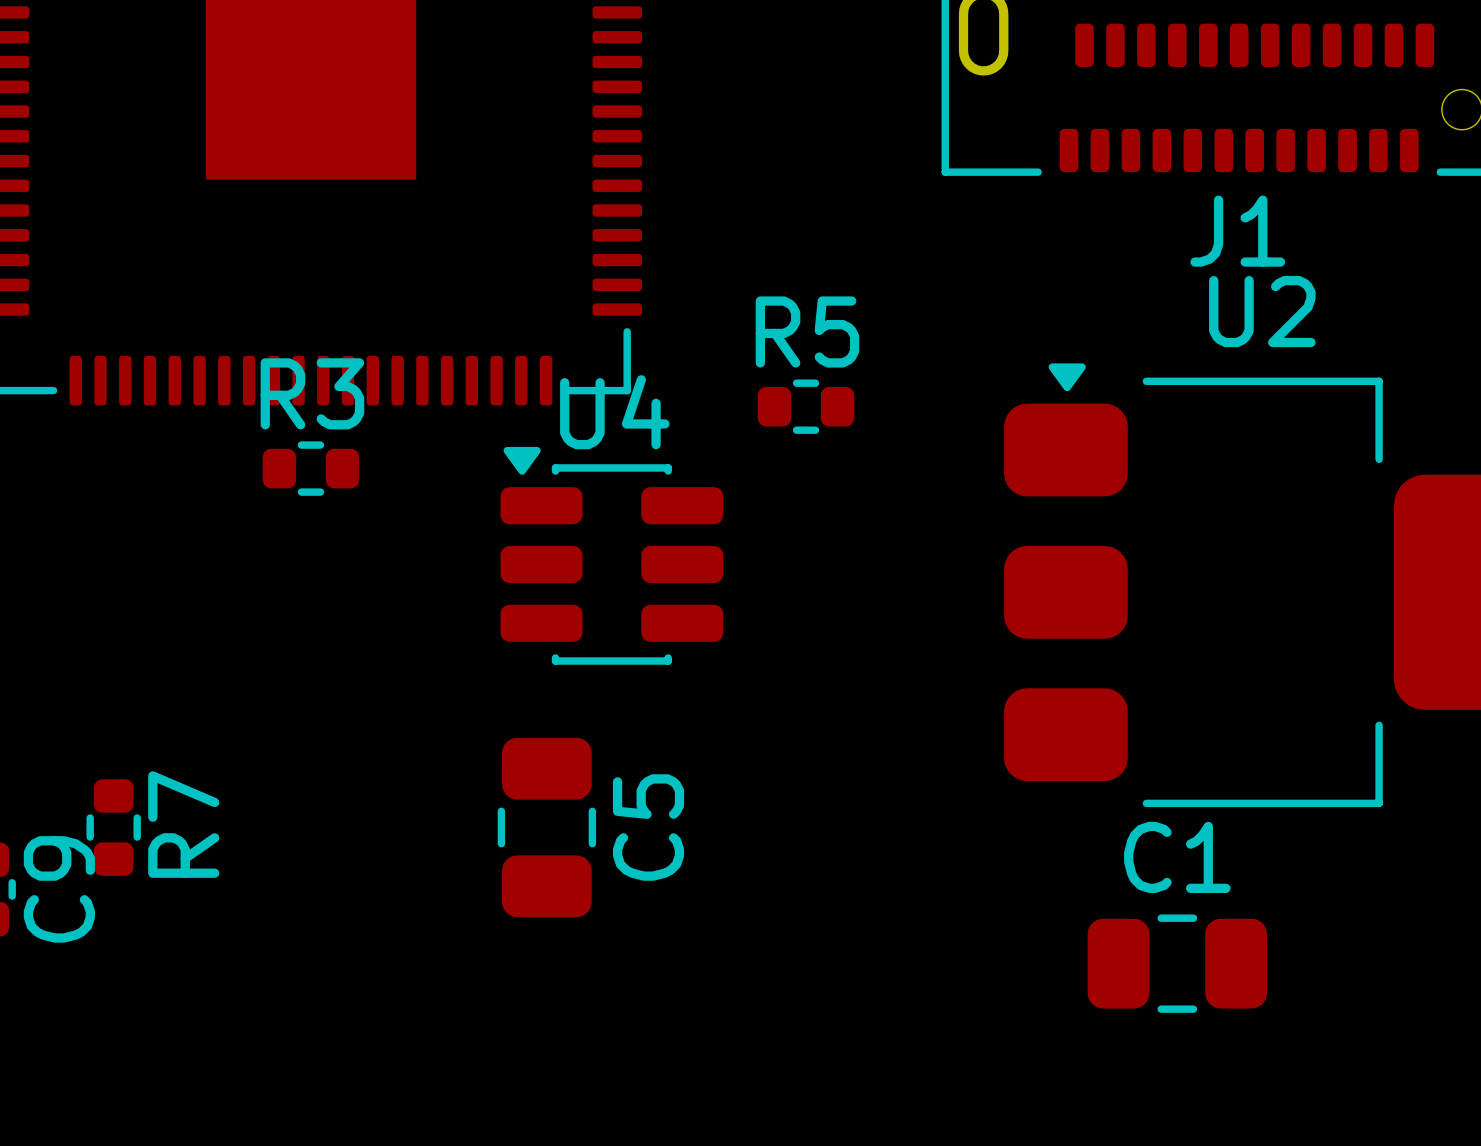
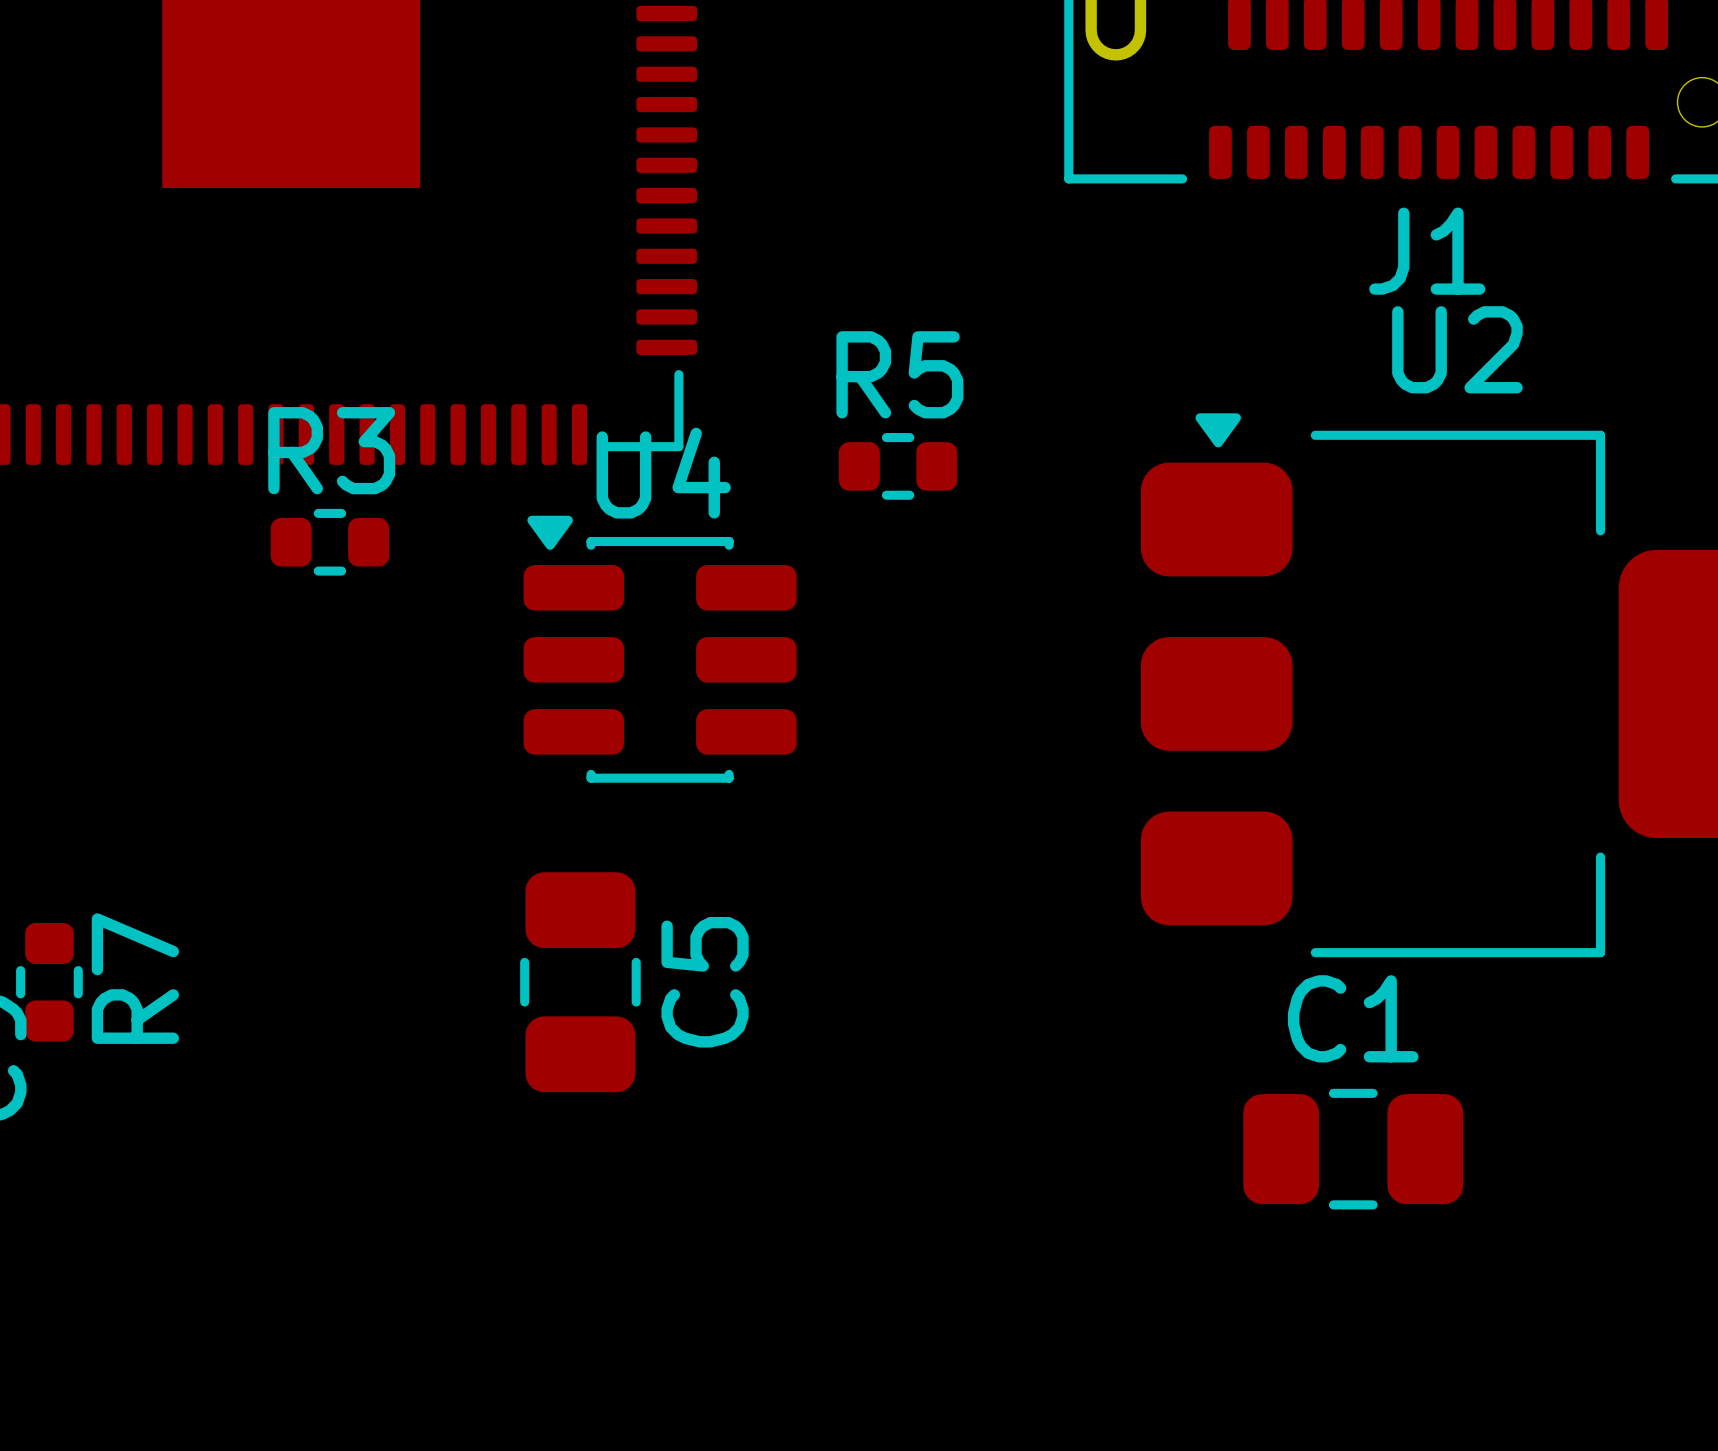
R3 position: (310, 468) -> (329, 542)

